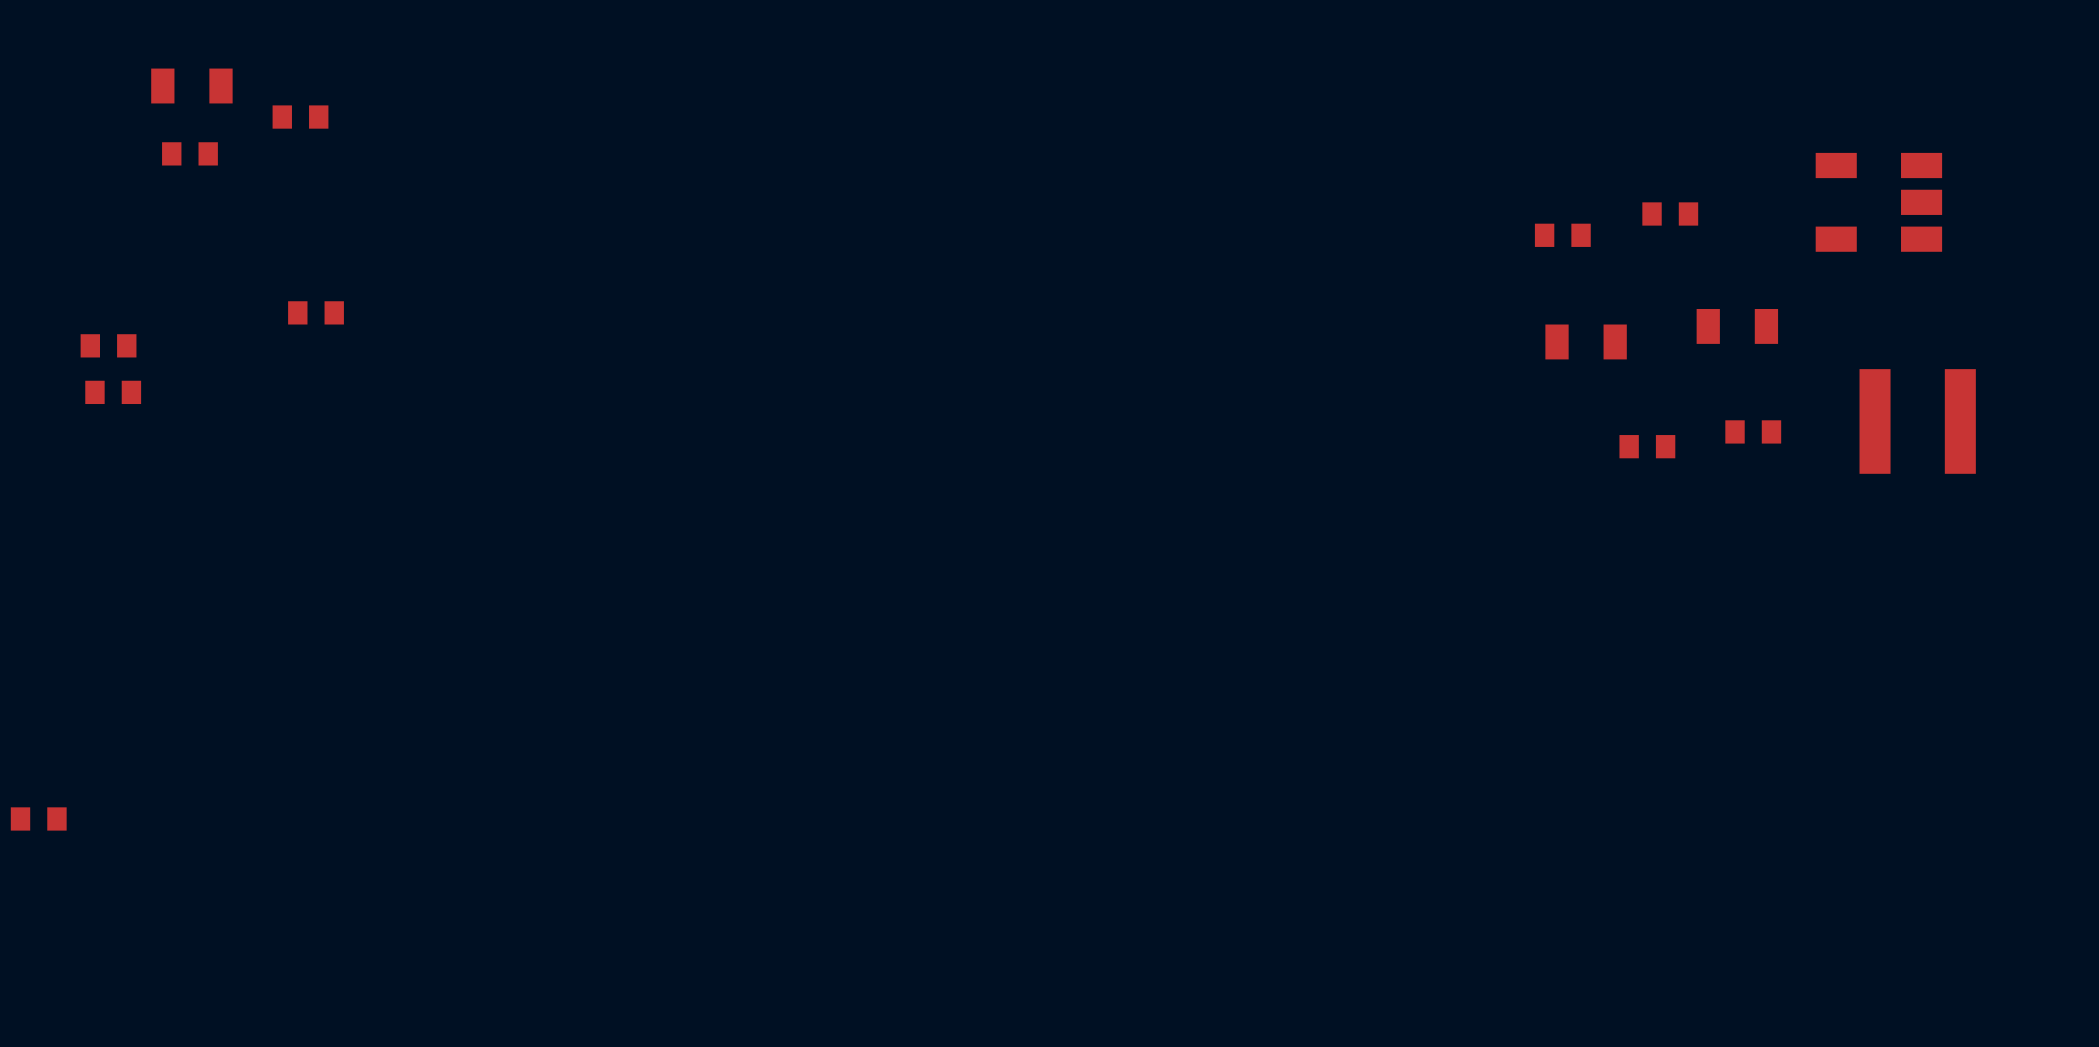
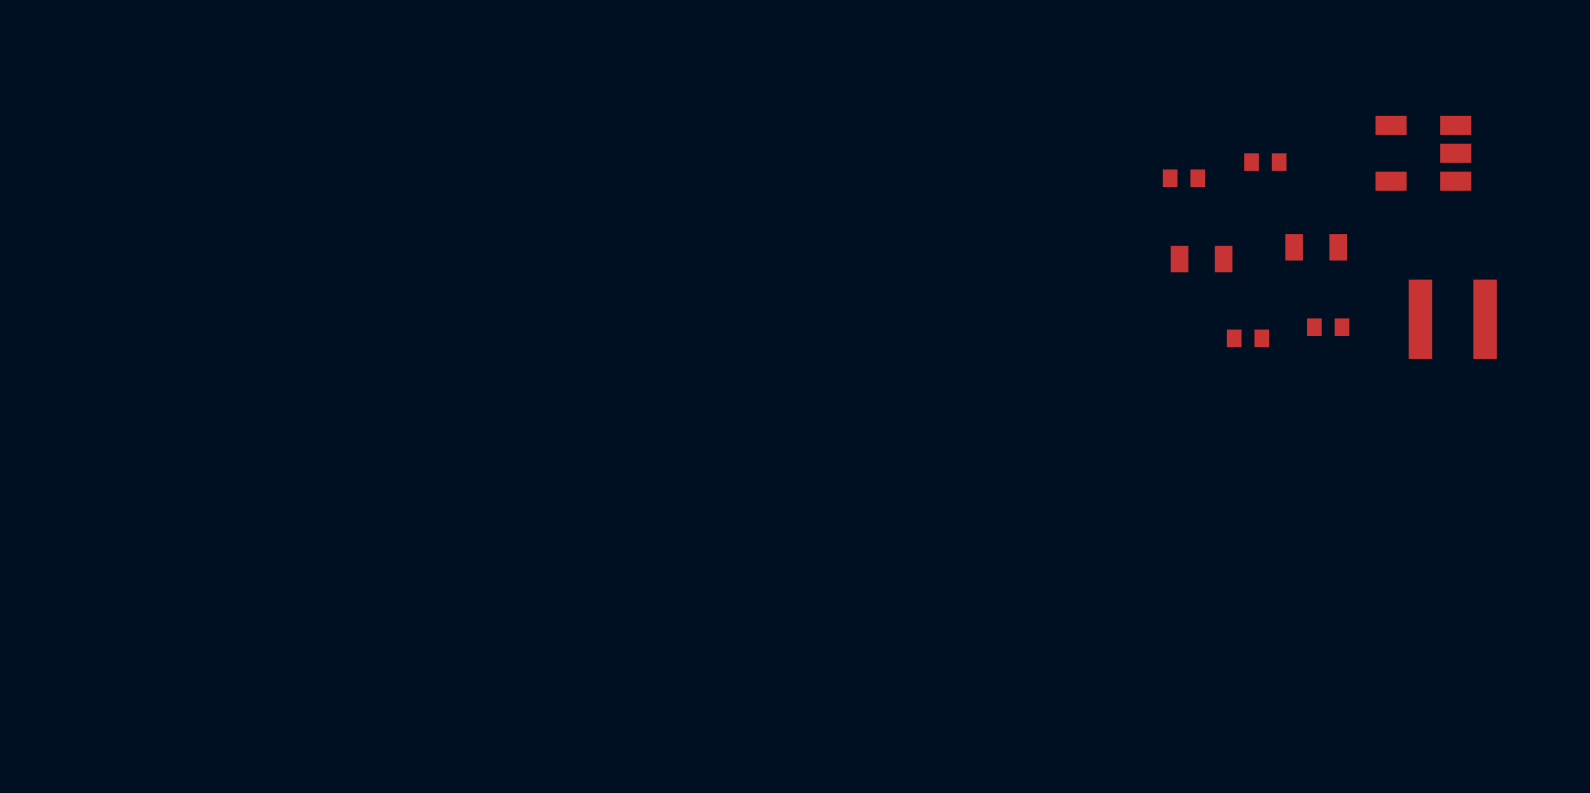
part: (191, 86) -> none
part: (300, 117) -> none
part: (189, 153) -> none
part: (316, 312) -> none
part: (108, 345) -> none
part: (113, 392) -> none
part: (38, 818) -> none

